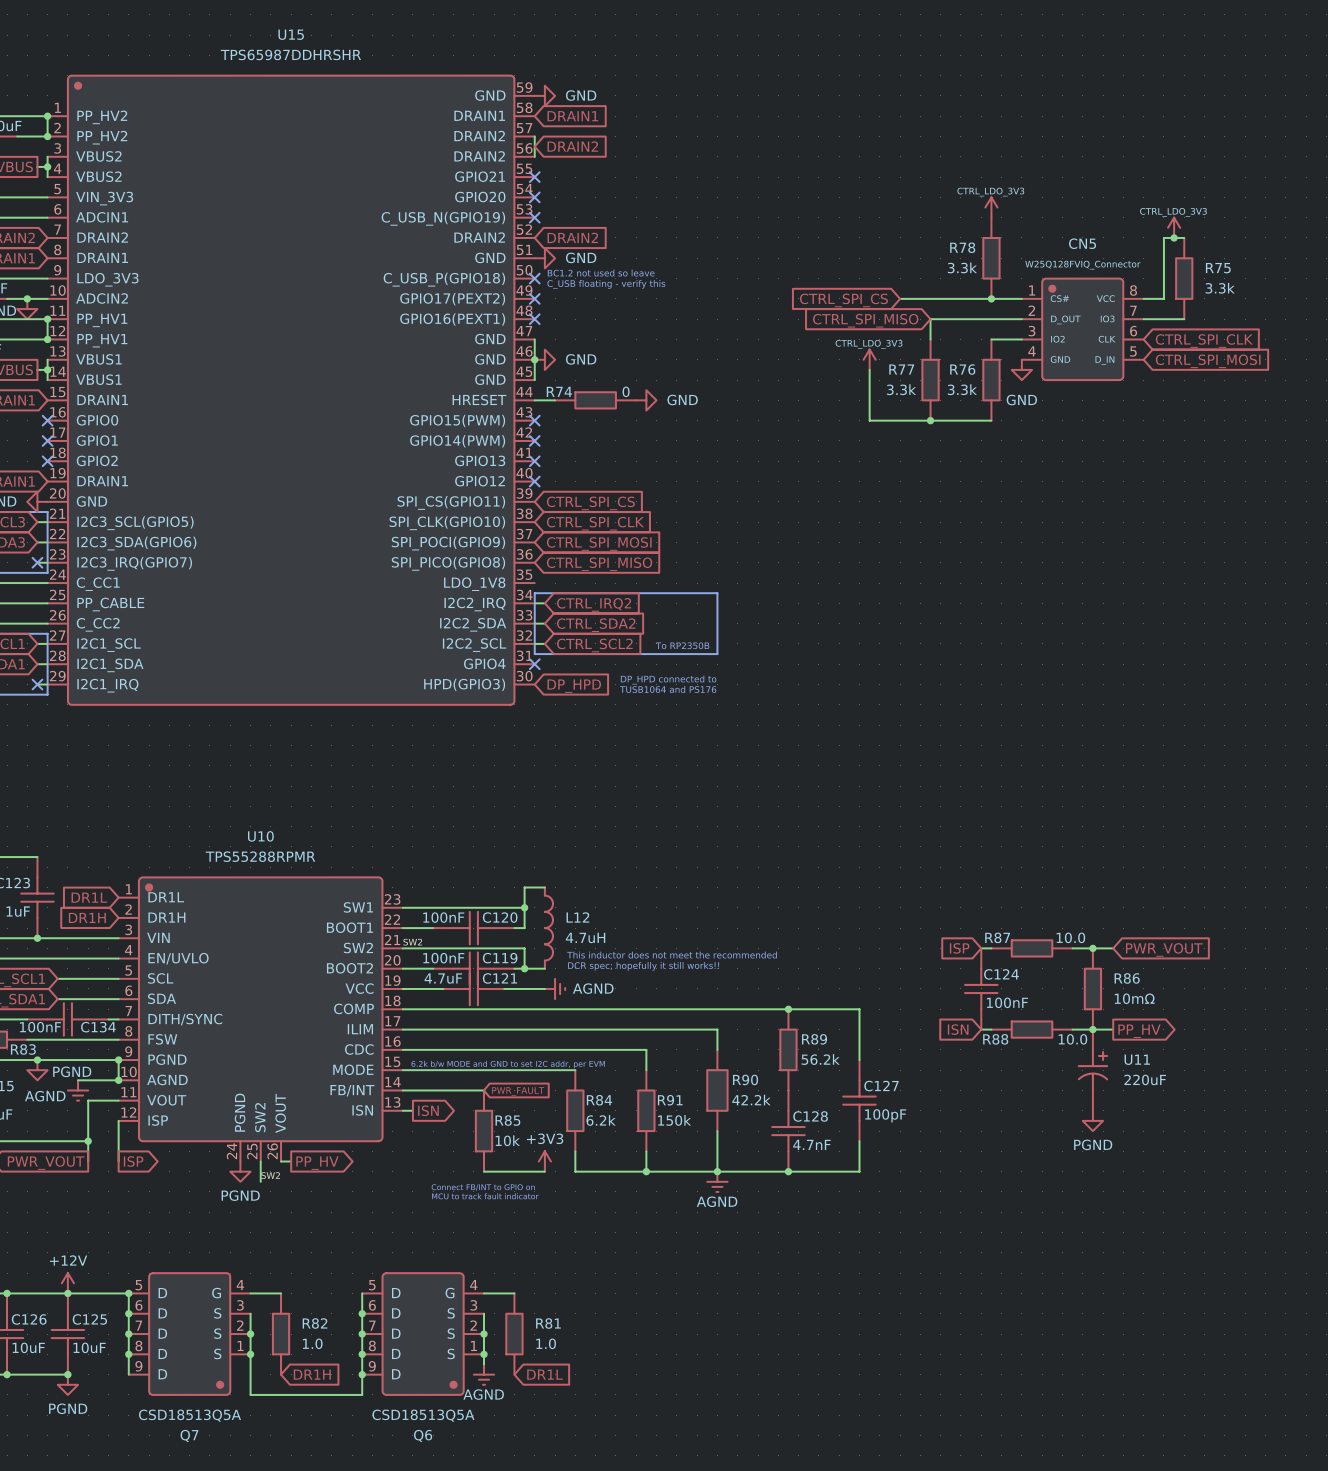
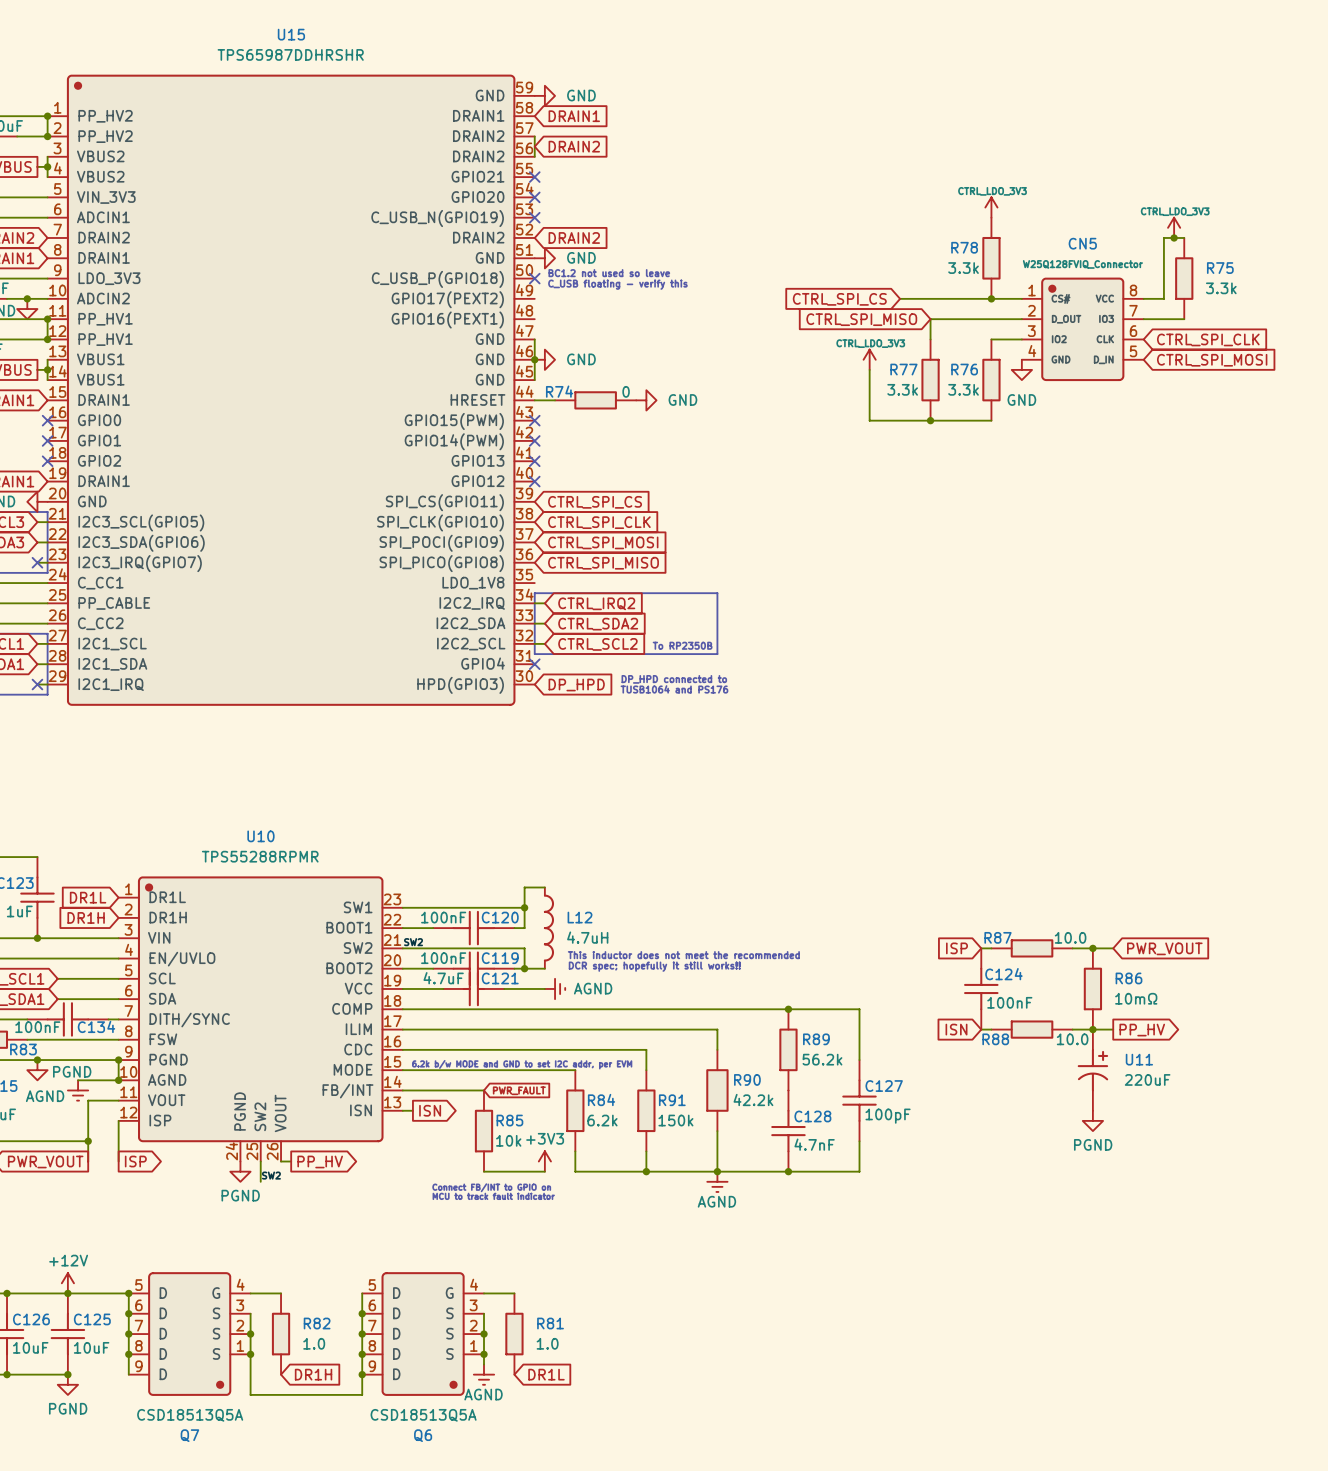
no-connect mark: (534, 298) -> none
no-connect mark: (534, 319) -> none

